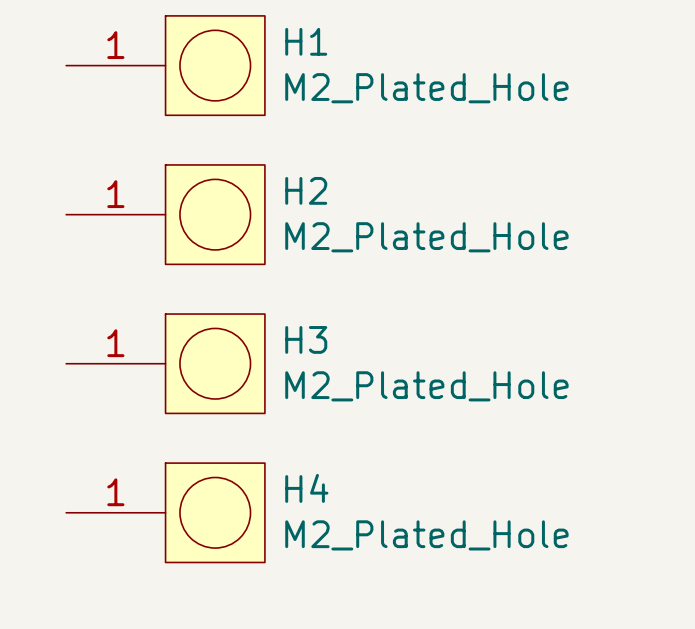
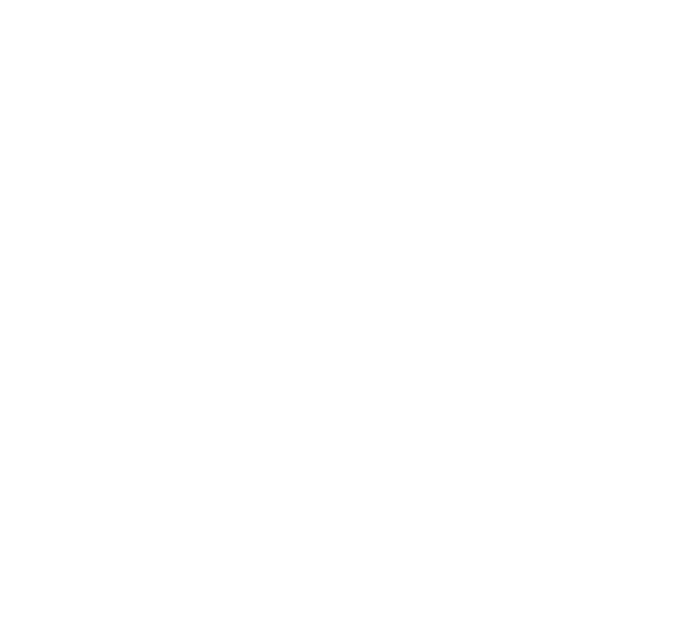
H1: M2_Plated_Hole (165, 65) -> none
H2: M2_Plated_Hole (165, 214) -> none
H3: M2_Plated_Hole (165, 363) -> none
H4: M2_Plated_Hole (165, 512) -> none

